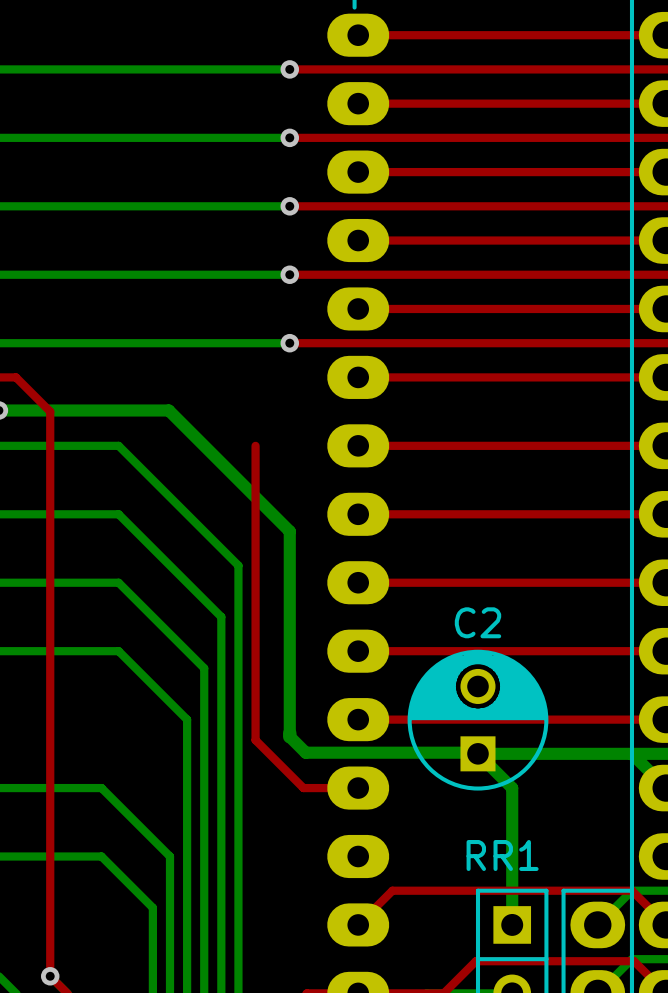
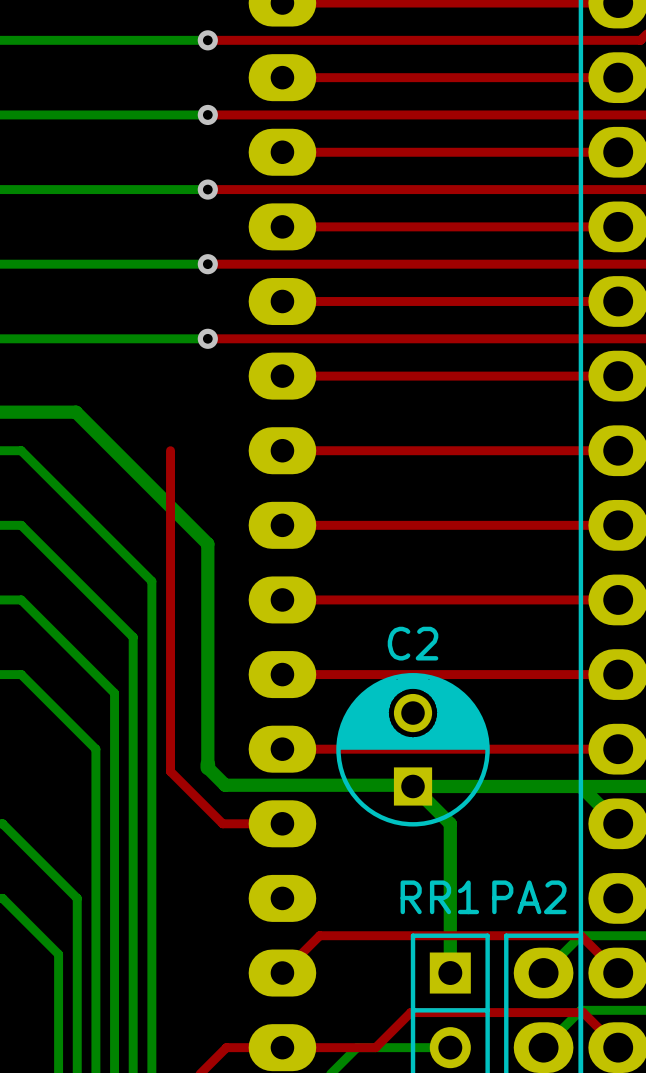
PA2 name: none -> PA2 (529, 897)

